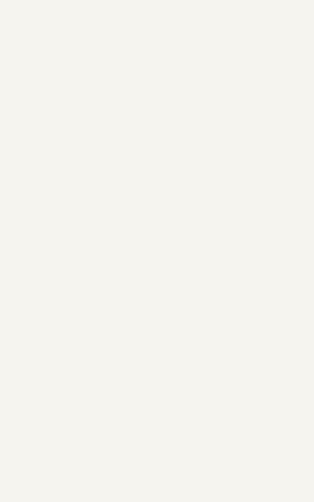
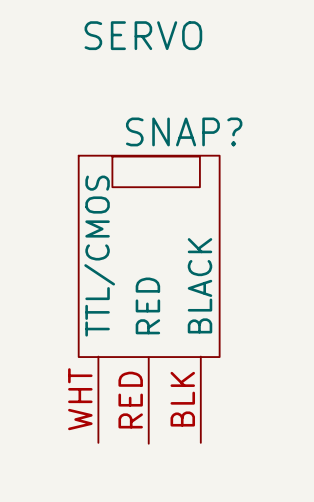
SNAP?: none -> SERVO (149, 299)

